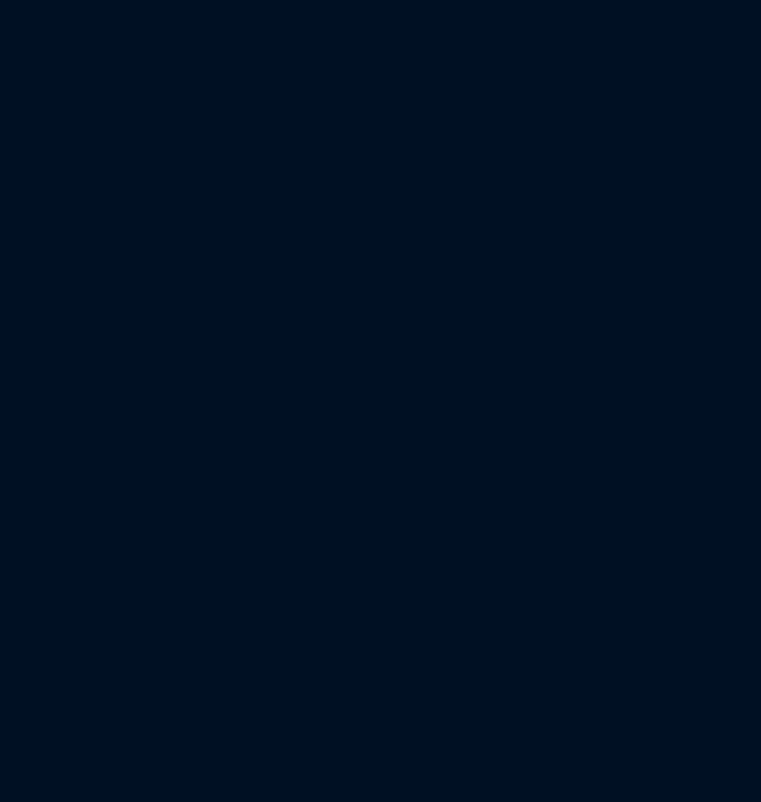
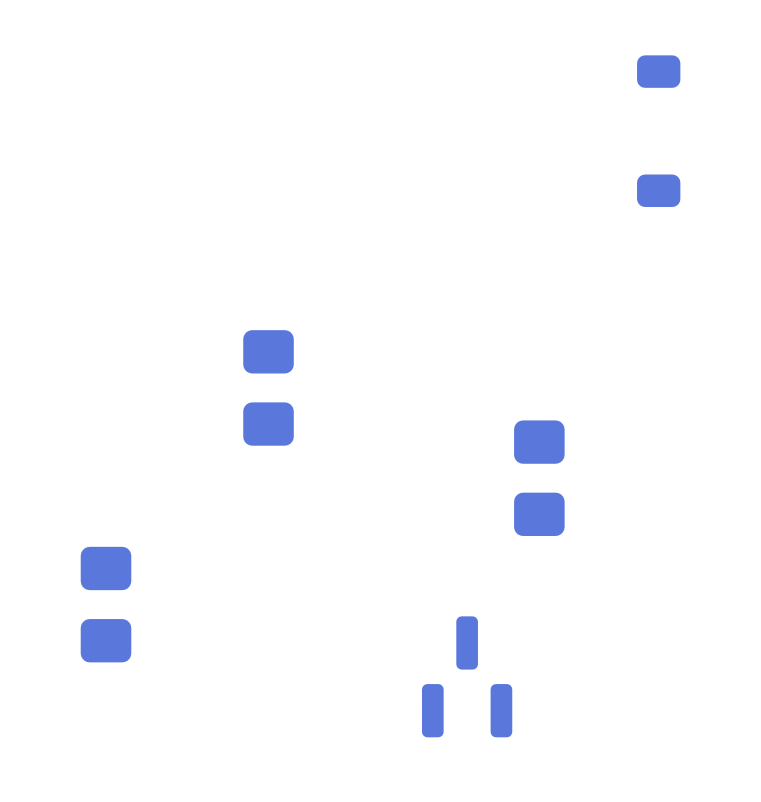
part: none -> (658, 131)
part: none -> (268, 387)
part: none -> (539, 478)
part: none -> (106, 604)
part: none -> (467, 676)

